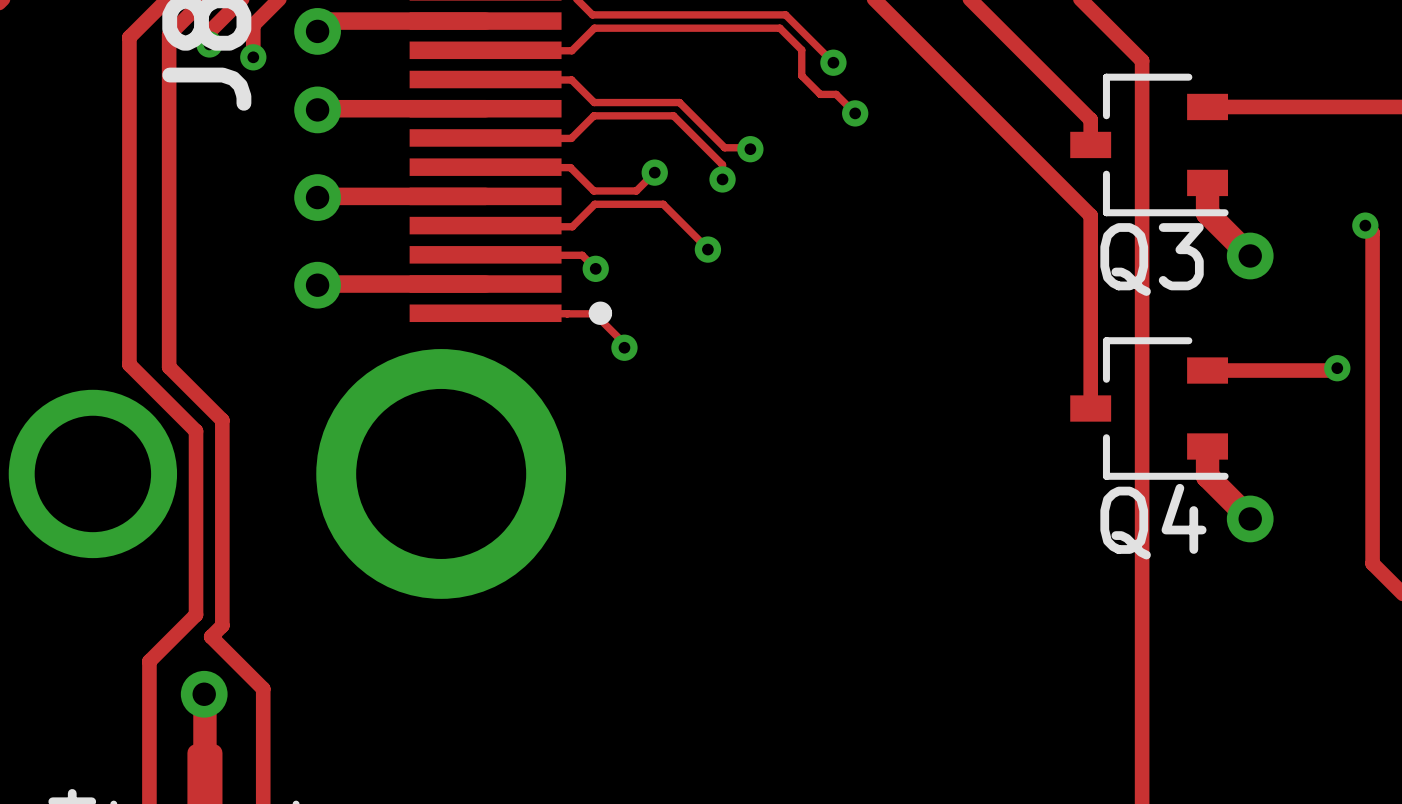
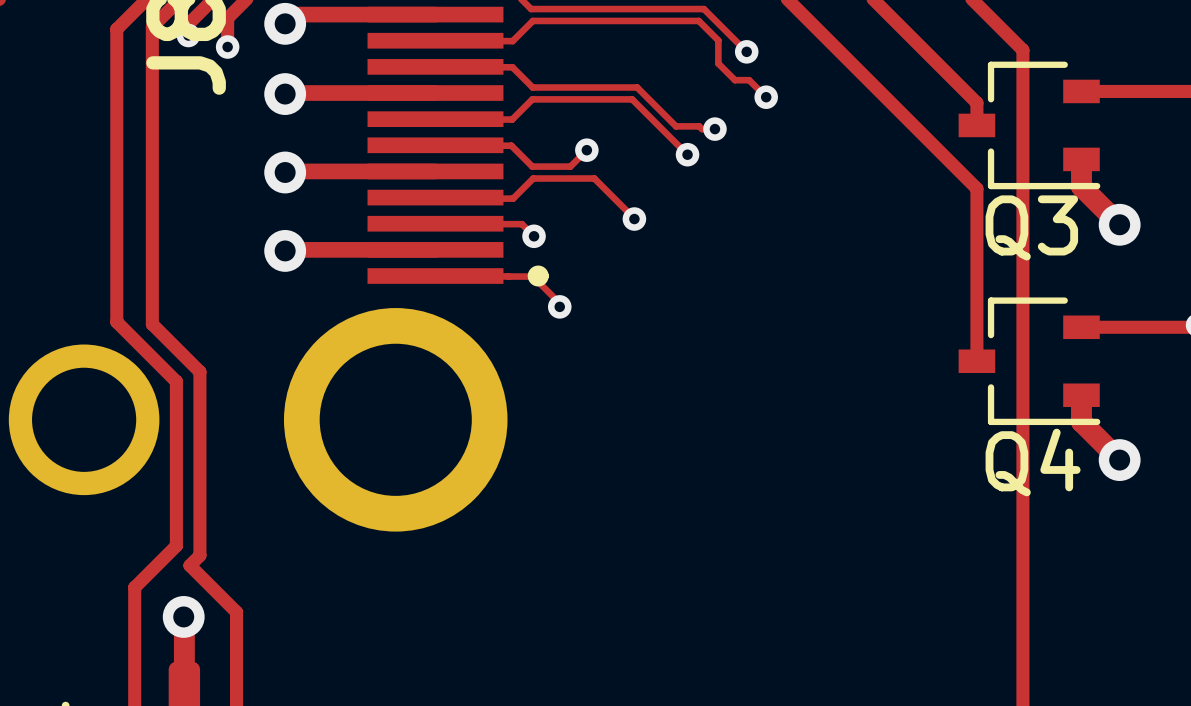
track: (679, 102) (724, 147) (750, 149) -> (609, 87) (637, 87) (676, 126) (699, 126) (702, 129) (714, 129)
track: (673, 115) (722, 164) (722, 179) -> (603, 99) (632, 99) (687, 154)
via: (750, 149) -> none
via: none -> (714, 129)
via: none -> (687, 154)
via: (722, 179) -> none

